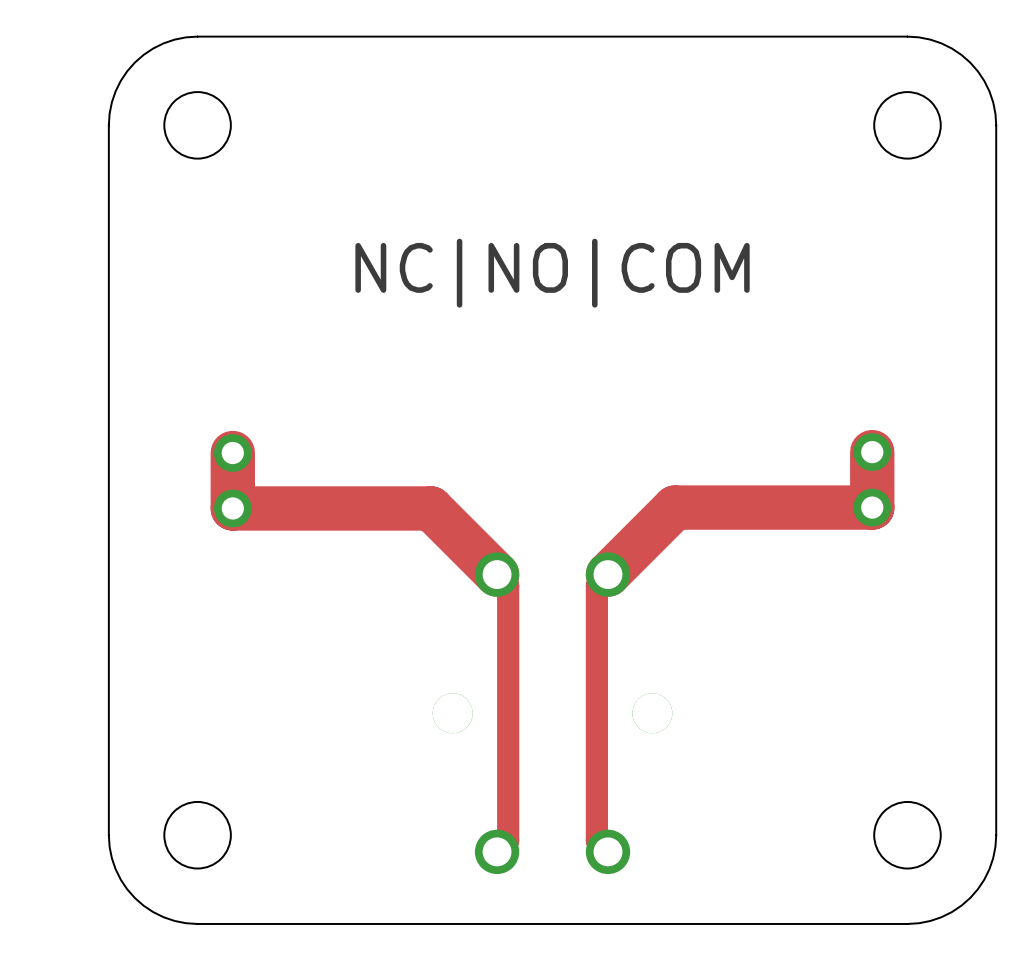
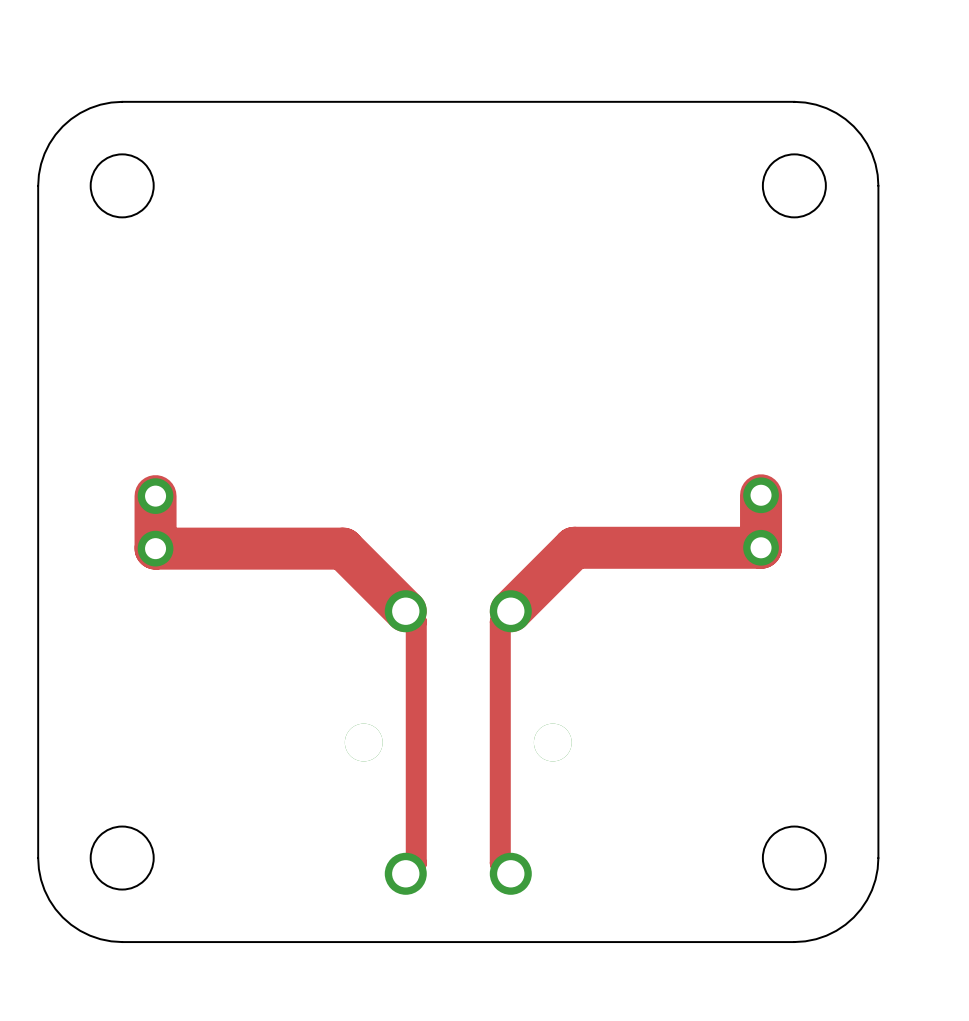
text: NC|NO|COM (552, 273) -> none

